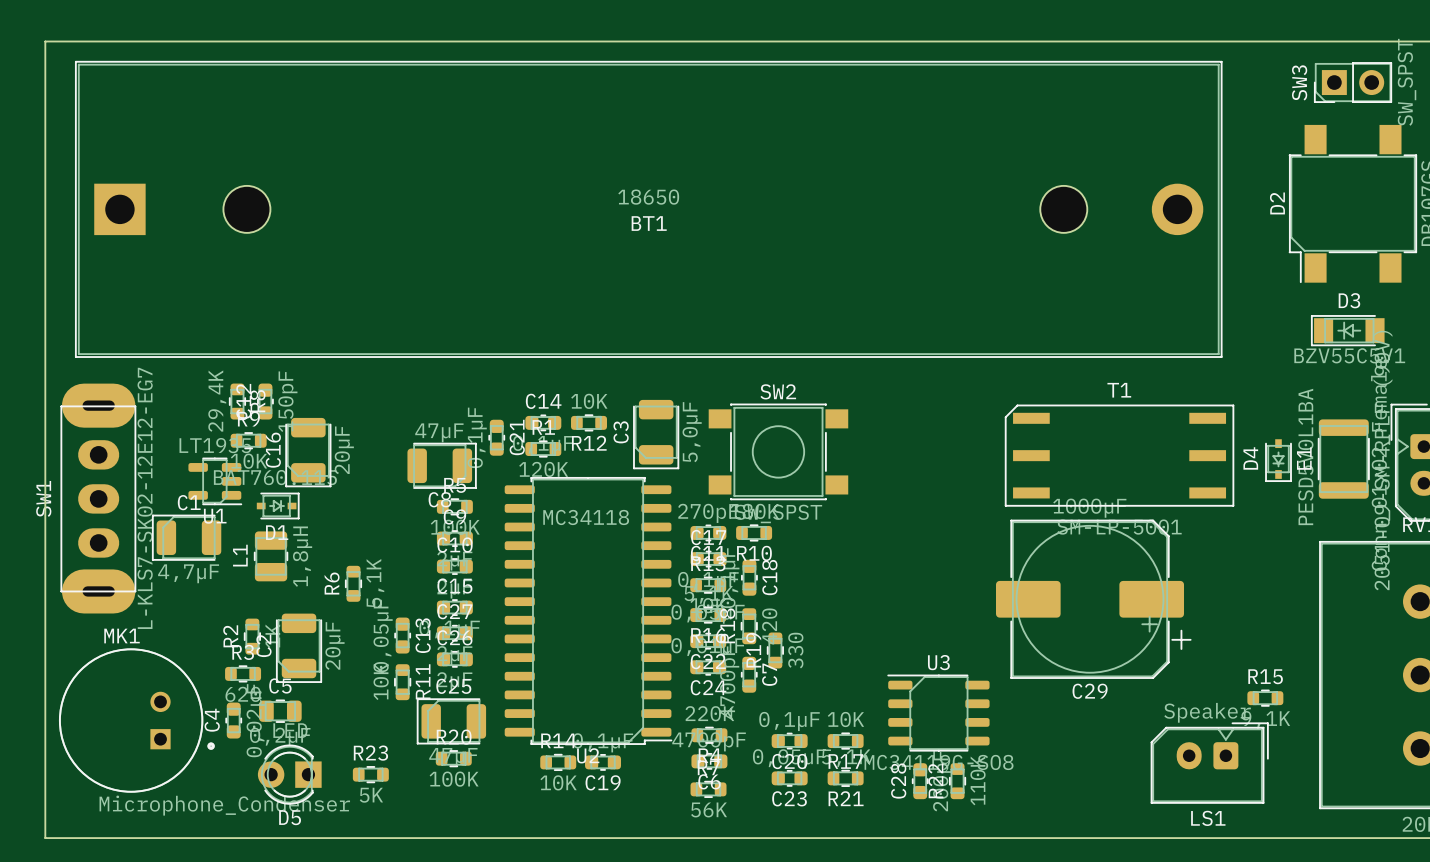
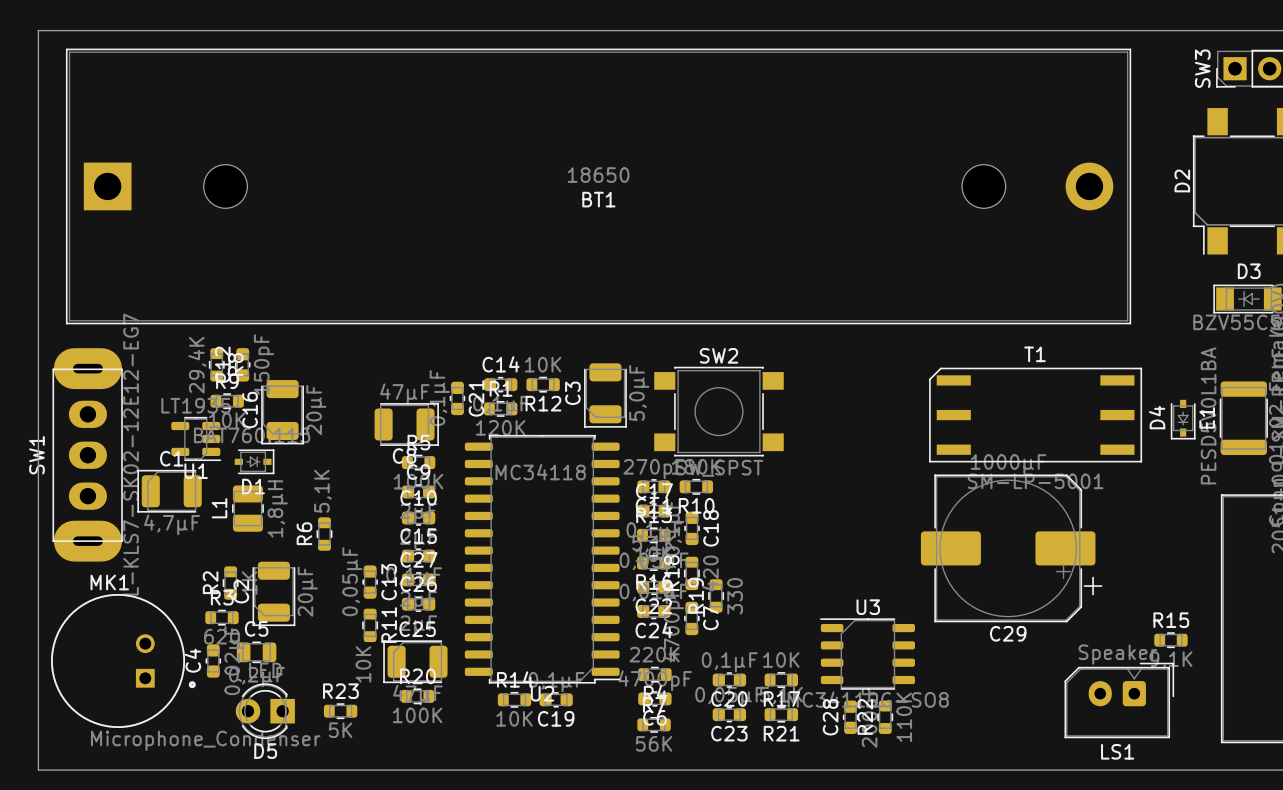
R6 value position: 5,1K (375, 583) -> 5,1K (322, 491)
R11 value position: 10K (381, 681) -> 10K (363, 664)

